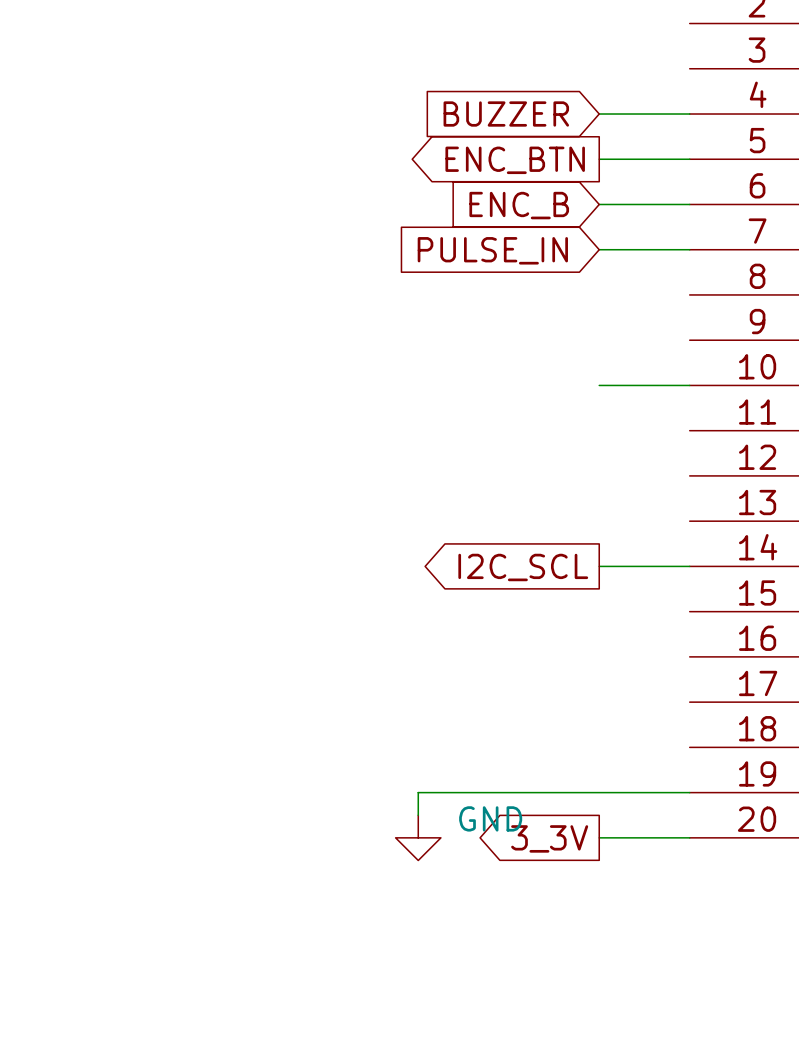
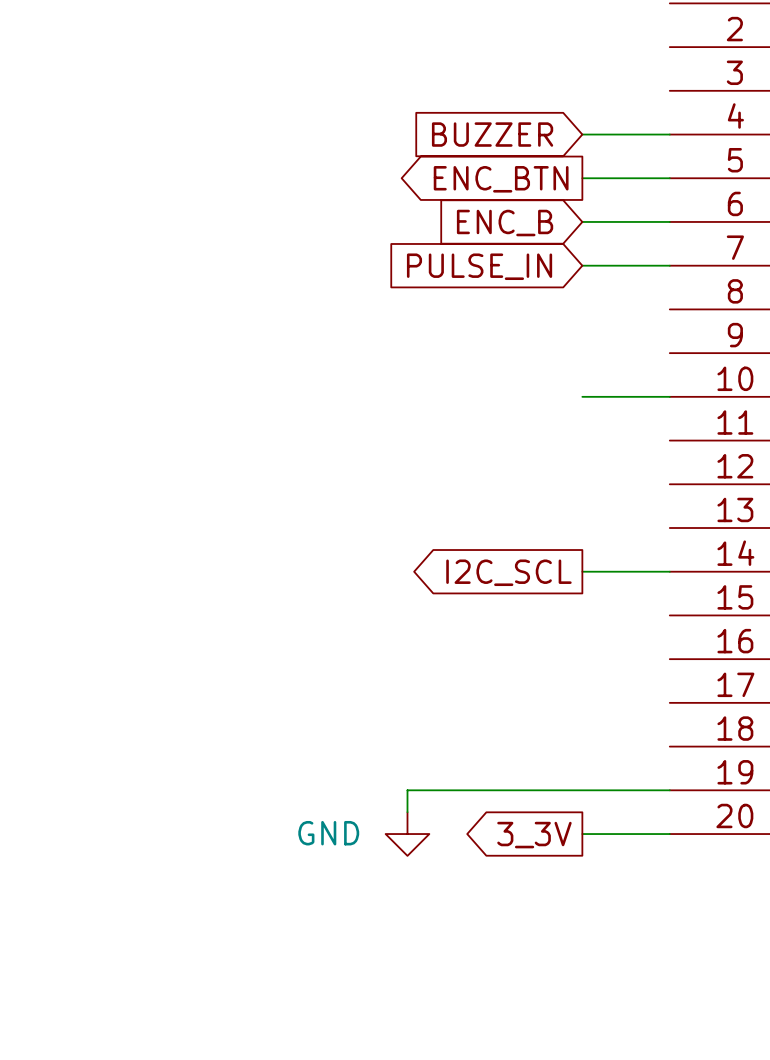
power symbol text position: GND (490, 818) -> GND (328, 833)

